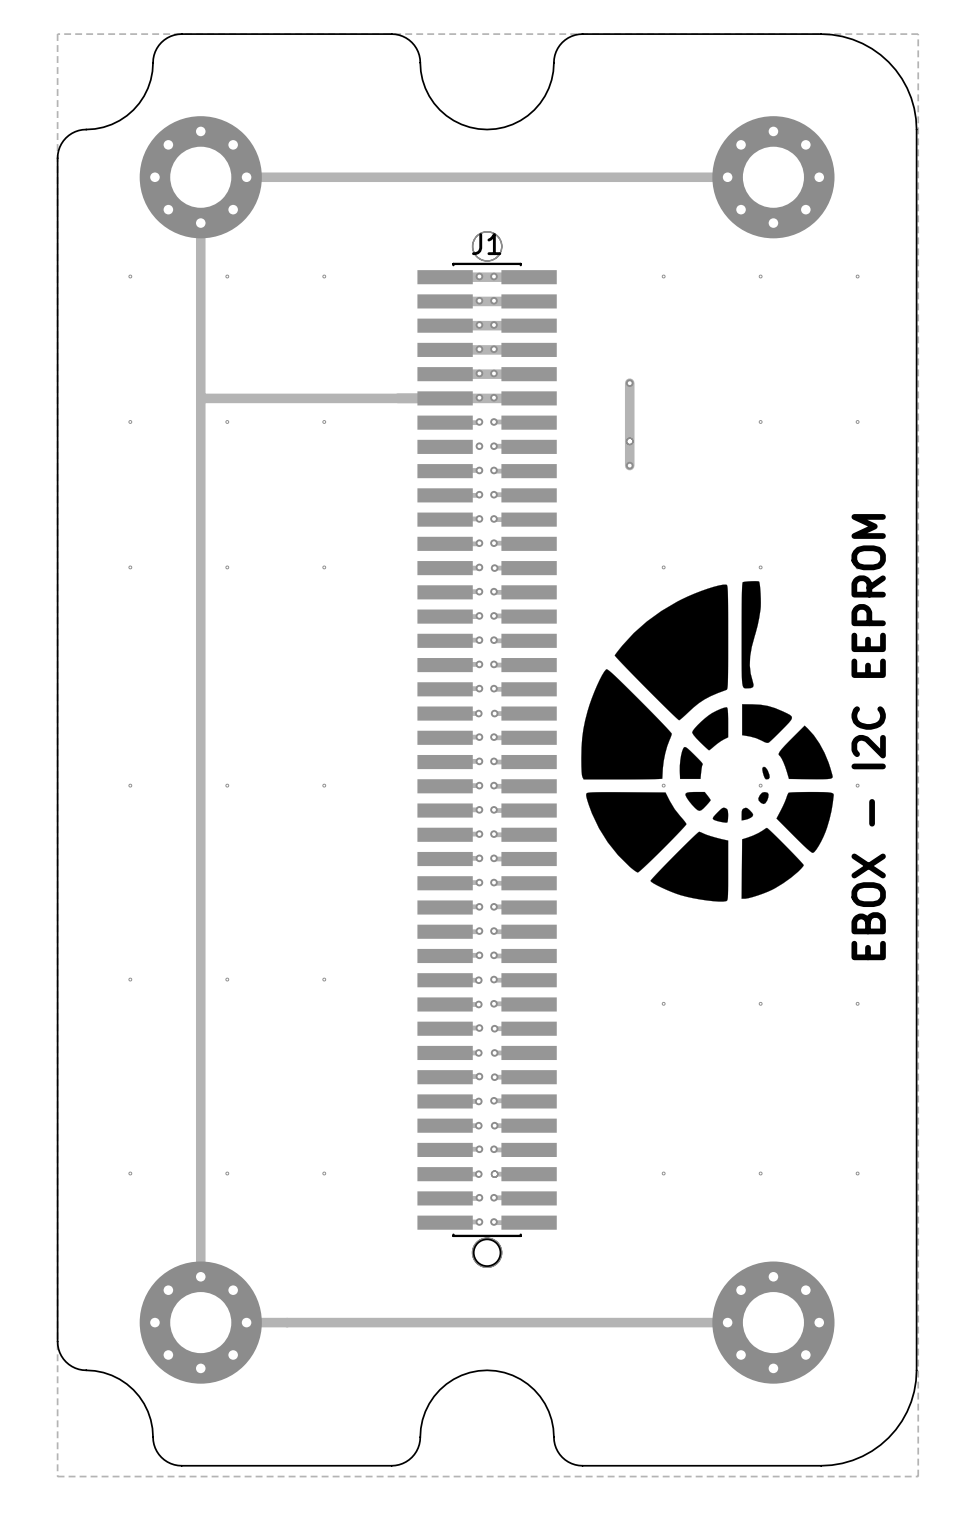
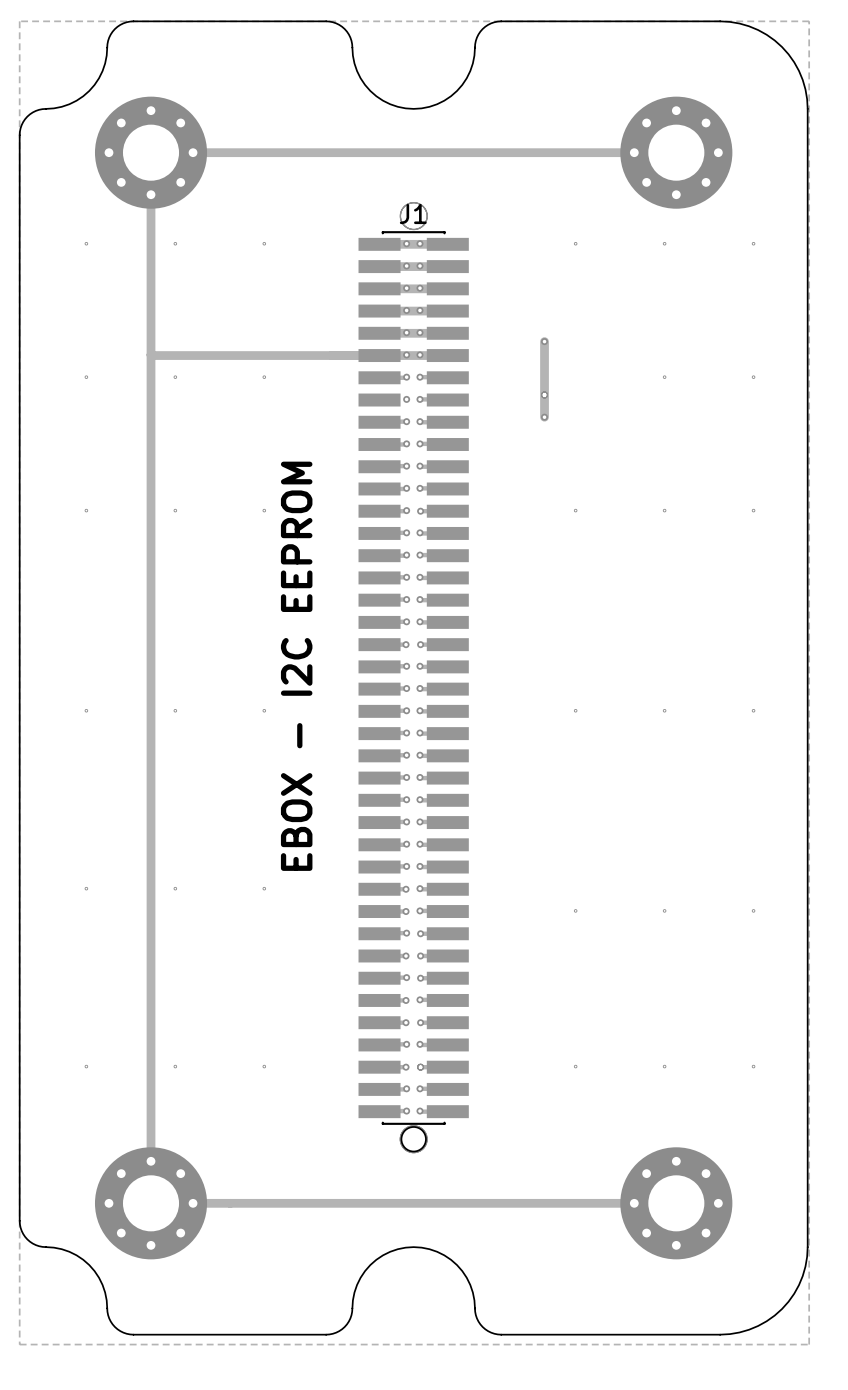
J1 footprint: [417, 231, 557, 1268] -> [358, 202, 469, 1154]
drawing: [581, 581, 834, 902] -> none
text: none -> EBOX - I2C EEPROM (296, 666)
text: EBOX - I2C EEPROM (868, 737) -> none

